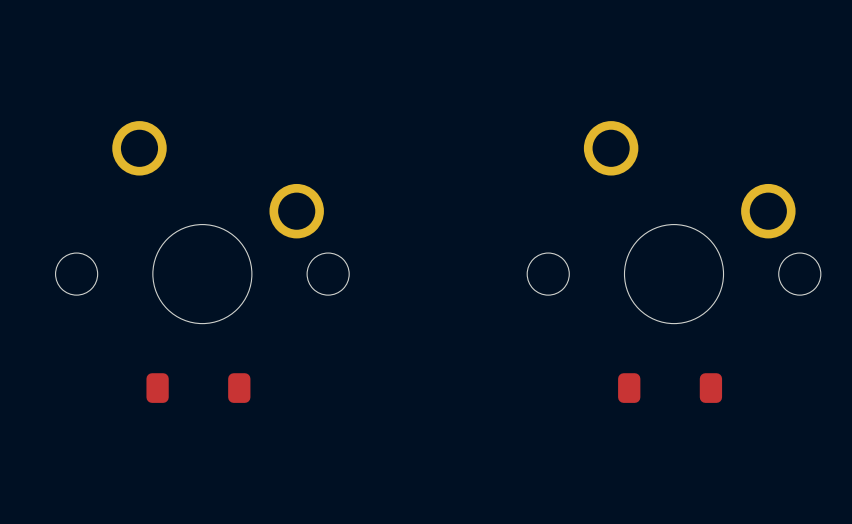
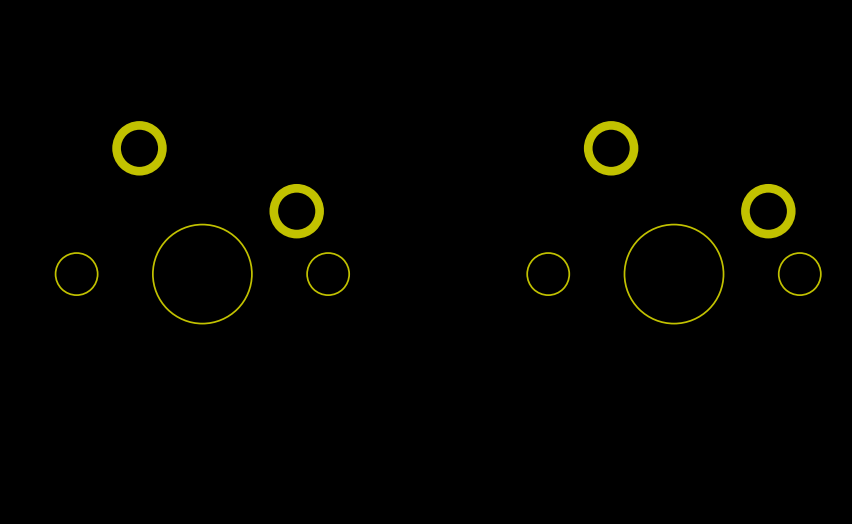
part: (198, 388) -> none
part: (670, 388) -> none

